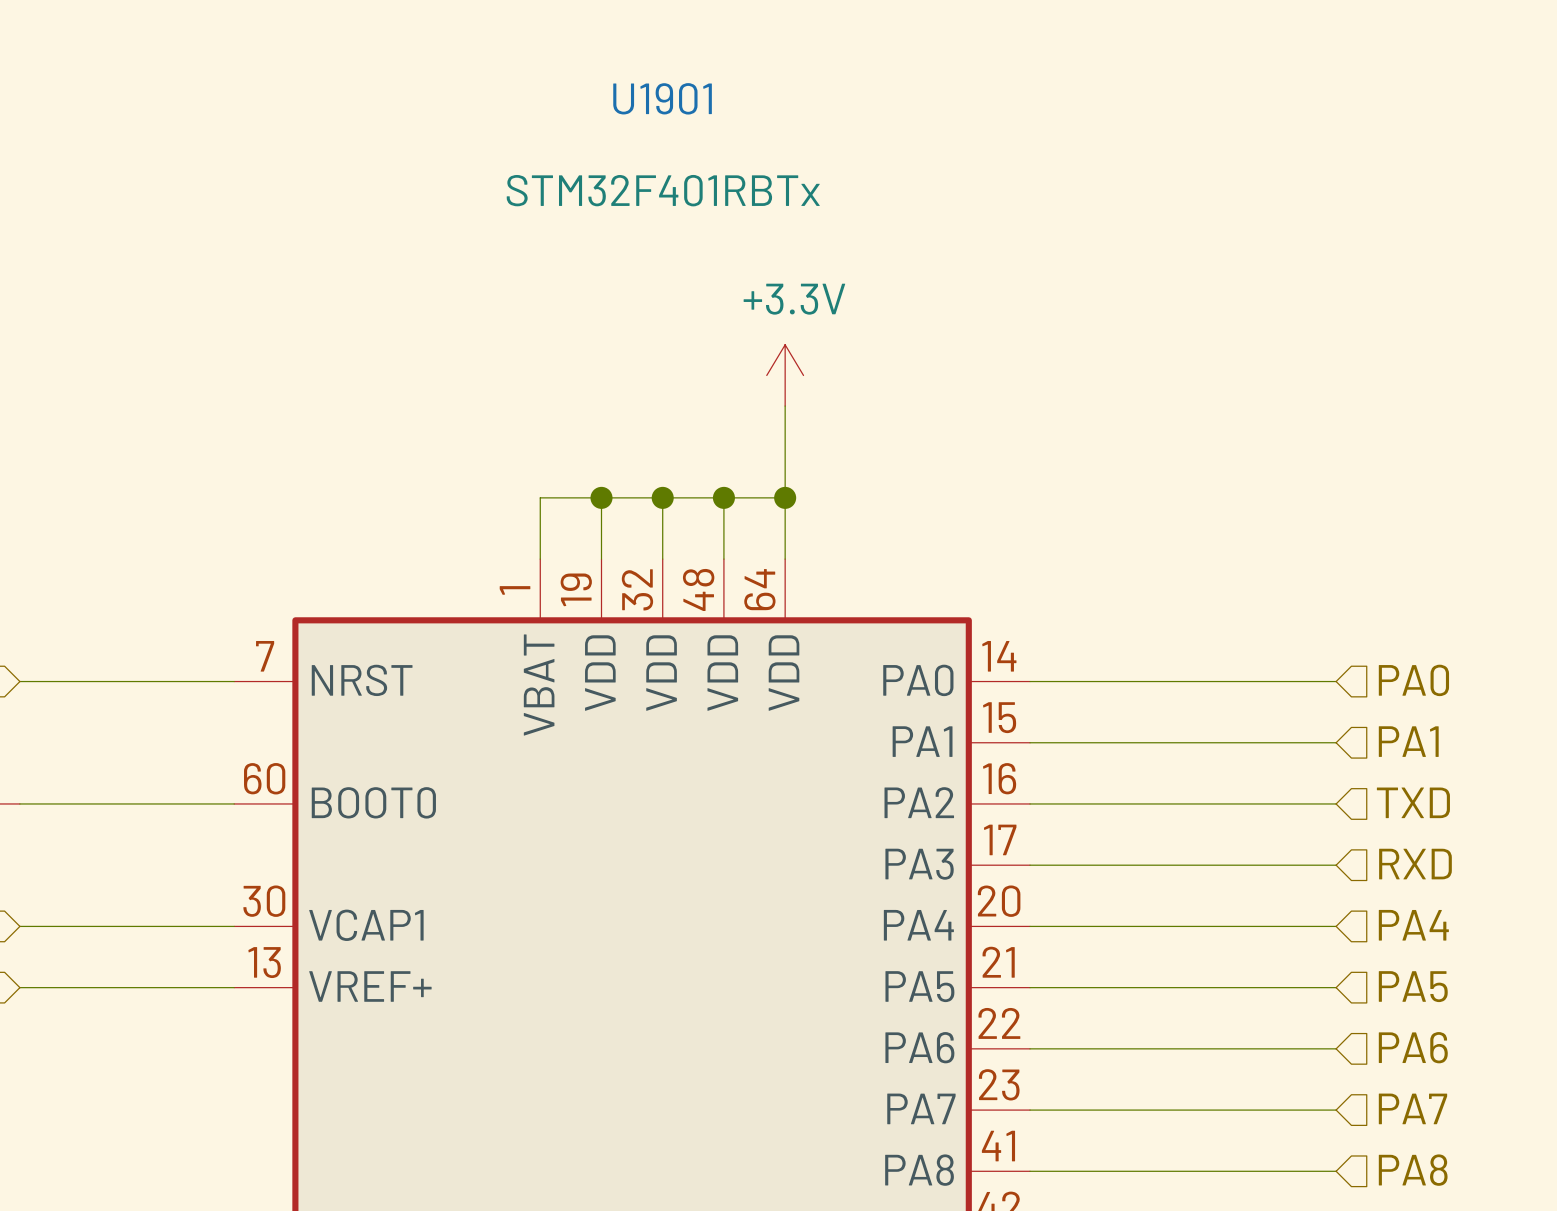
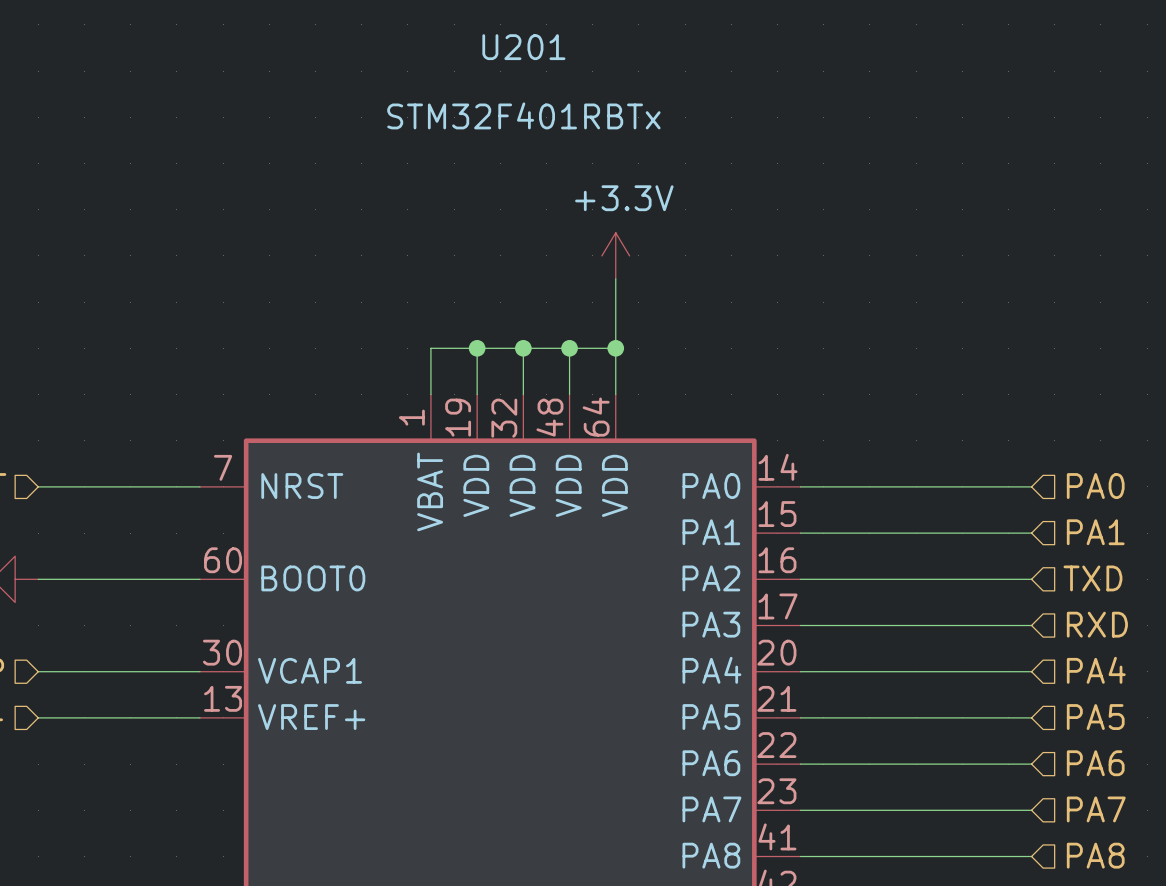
U1901 name: U1901 (662, 98) -> U201 (523, 47)

